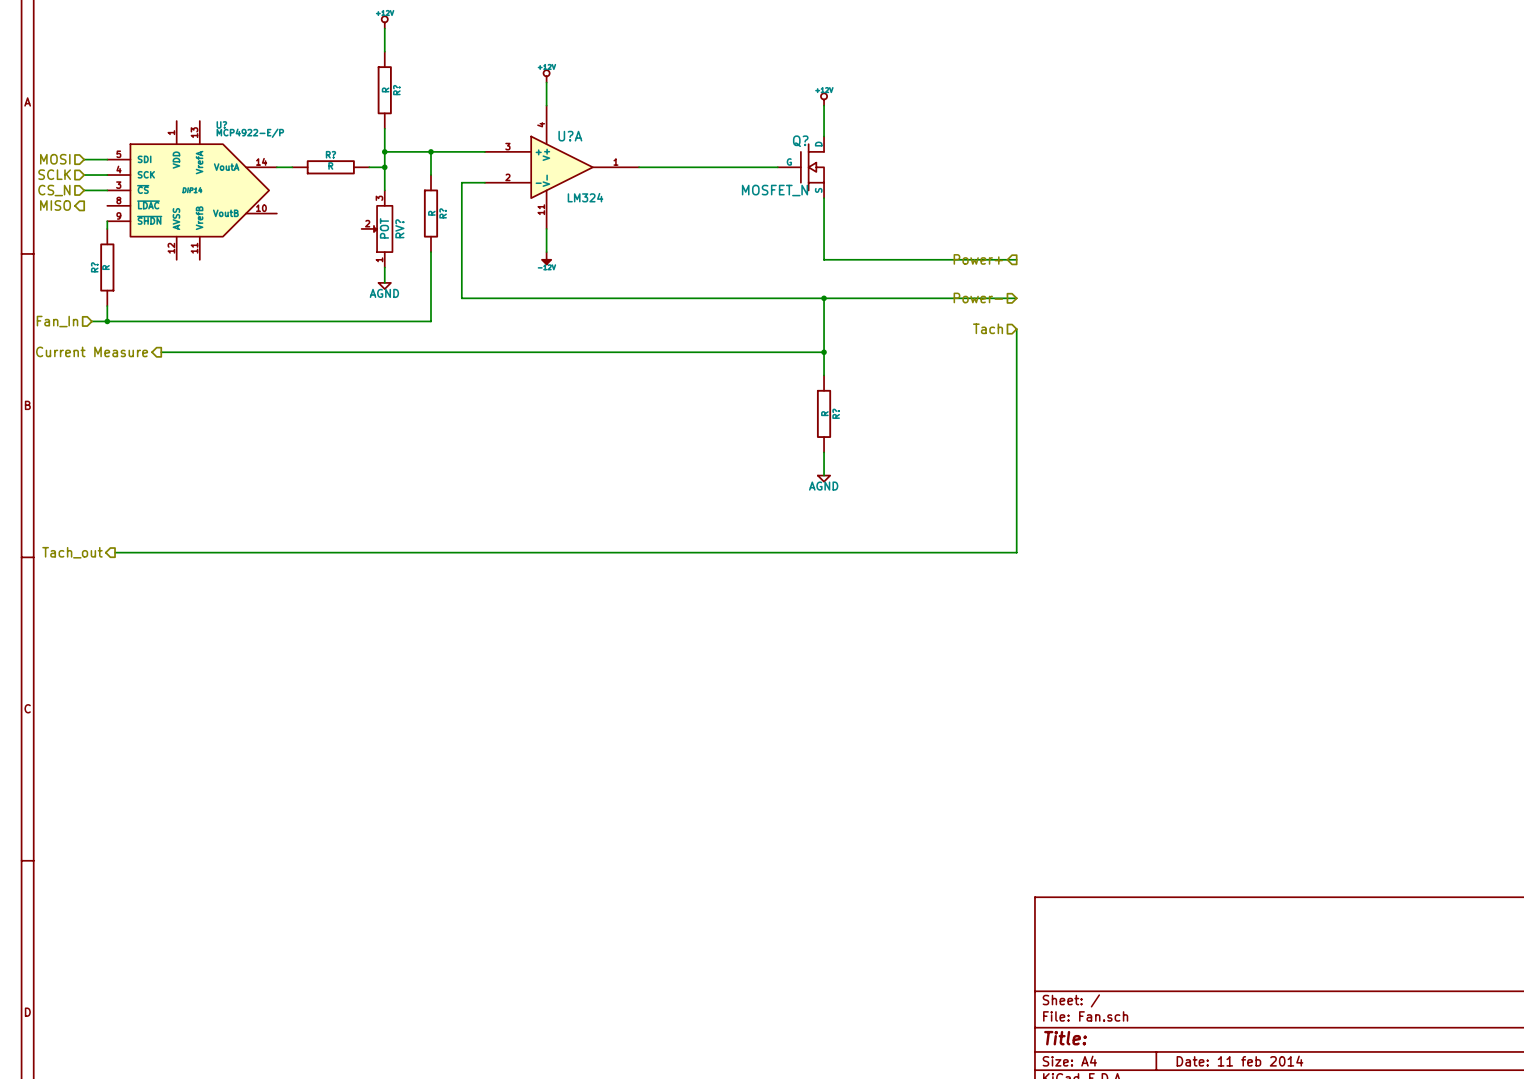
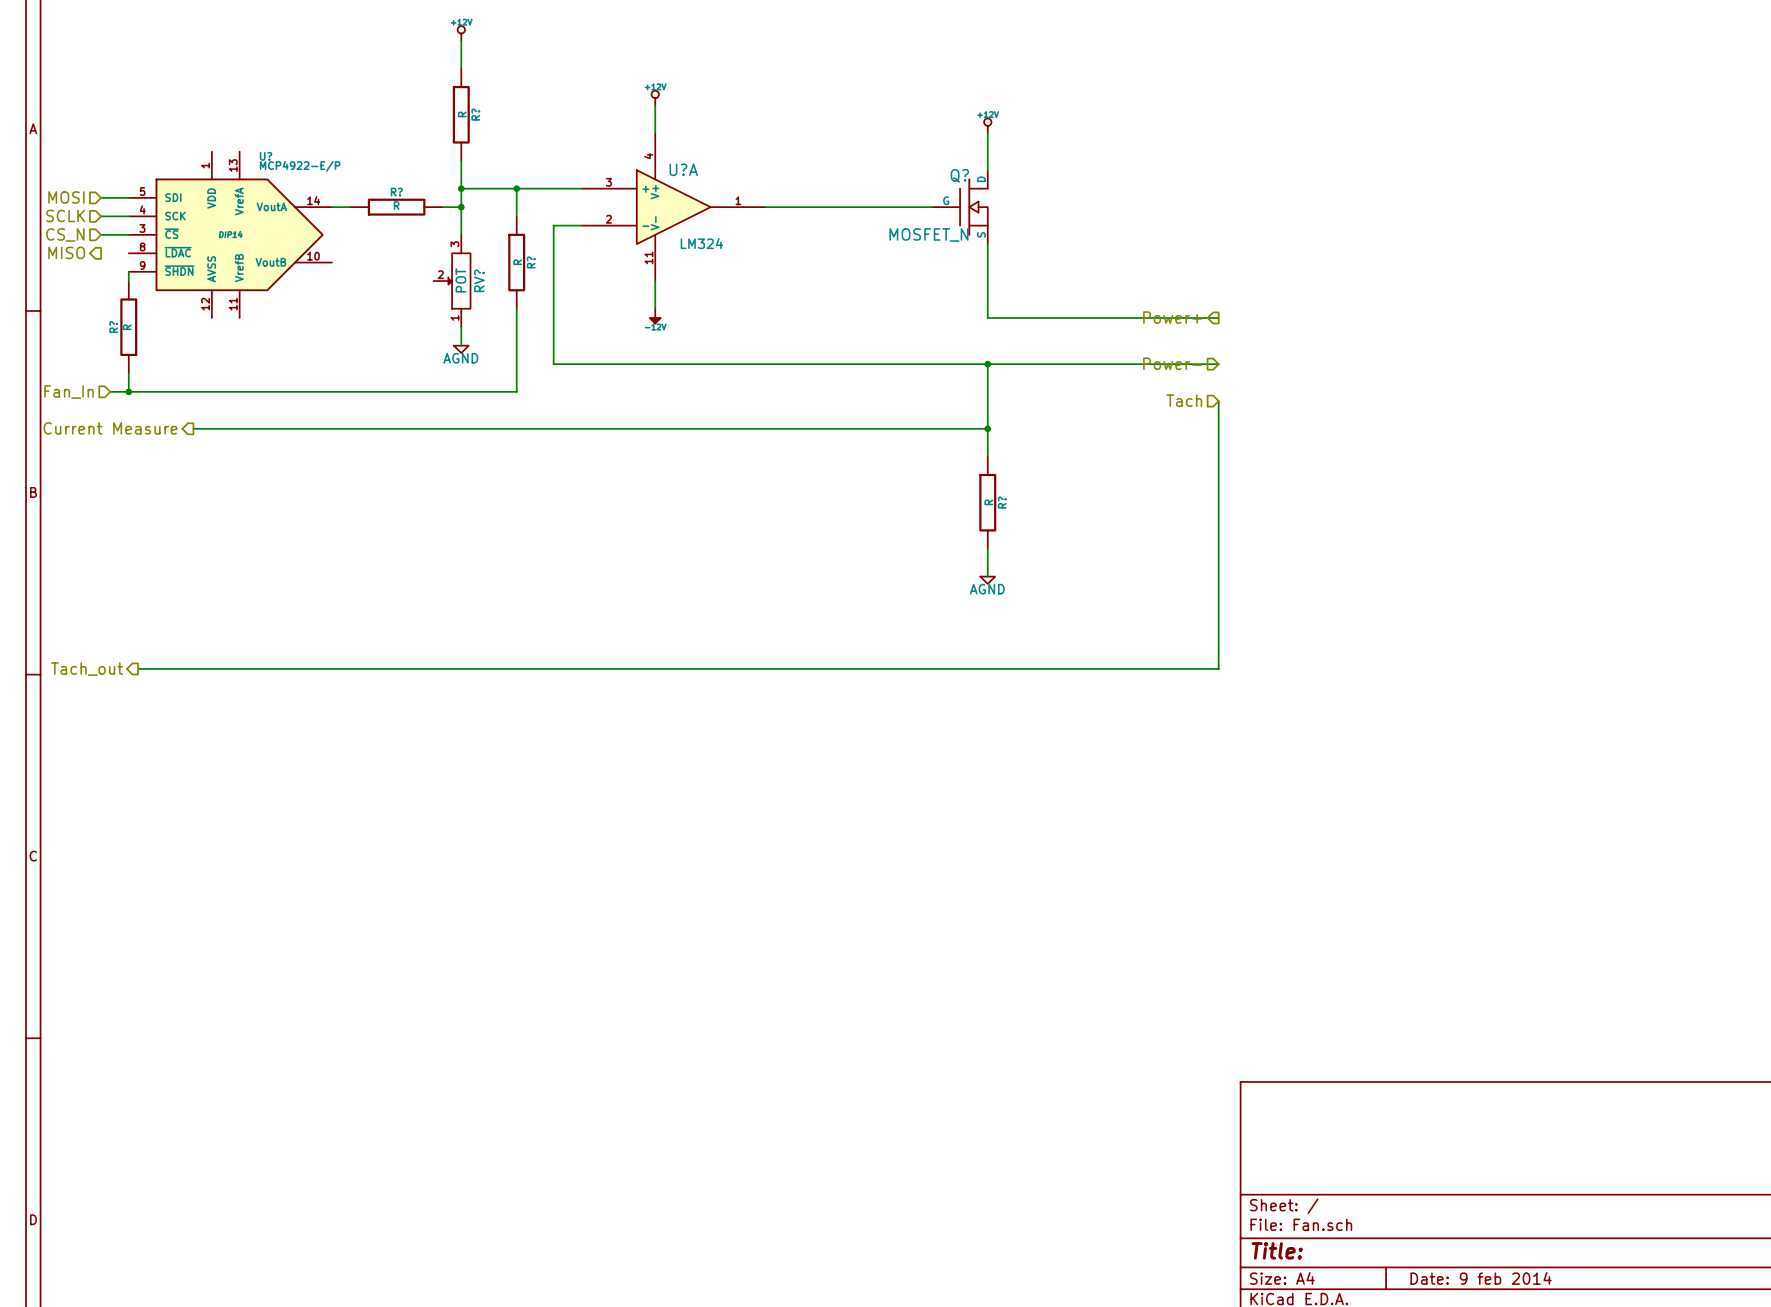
title block: Date: 11 feb 2014 (1239, 1061) -> Date: 9 feb 2014 (1481, 1278)

